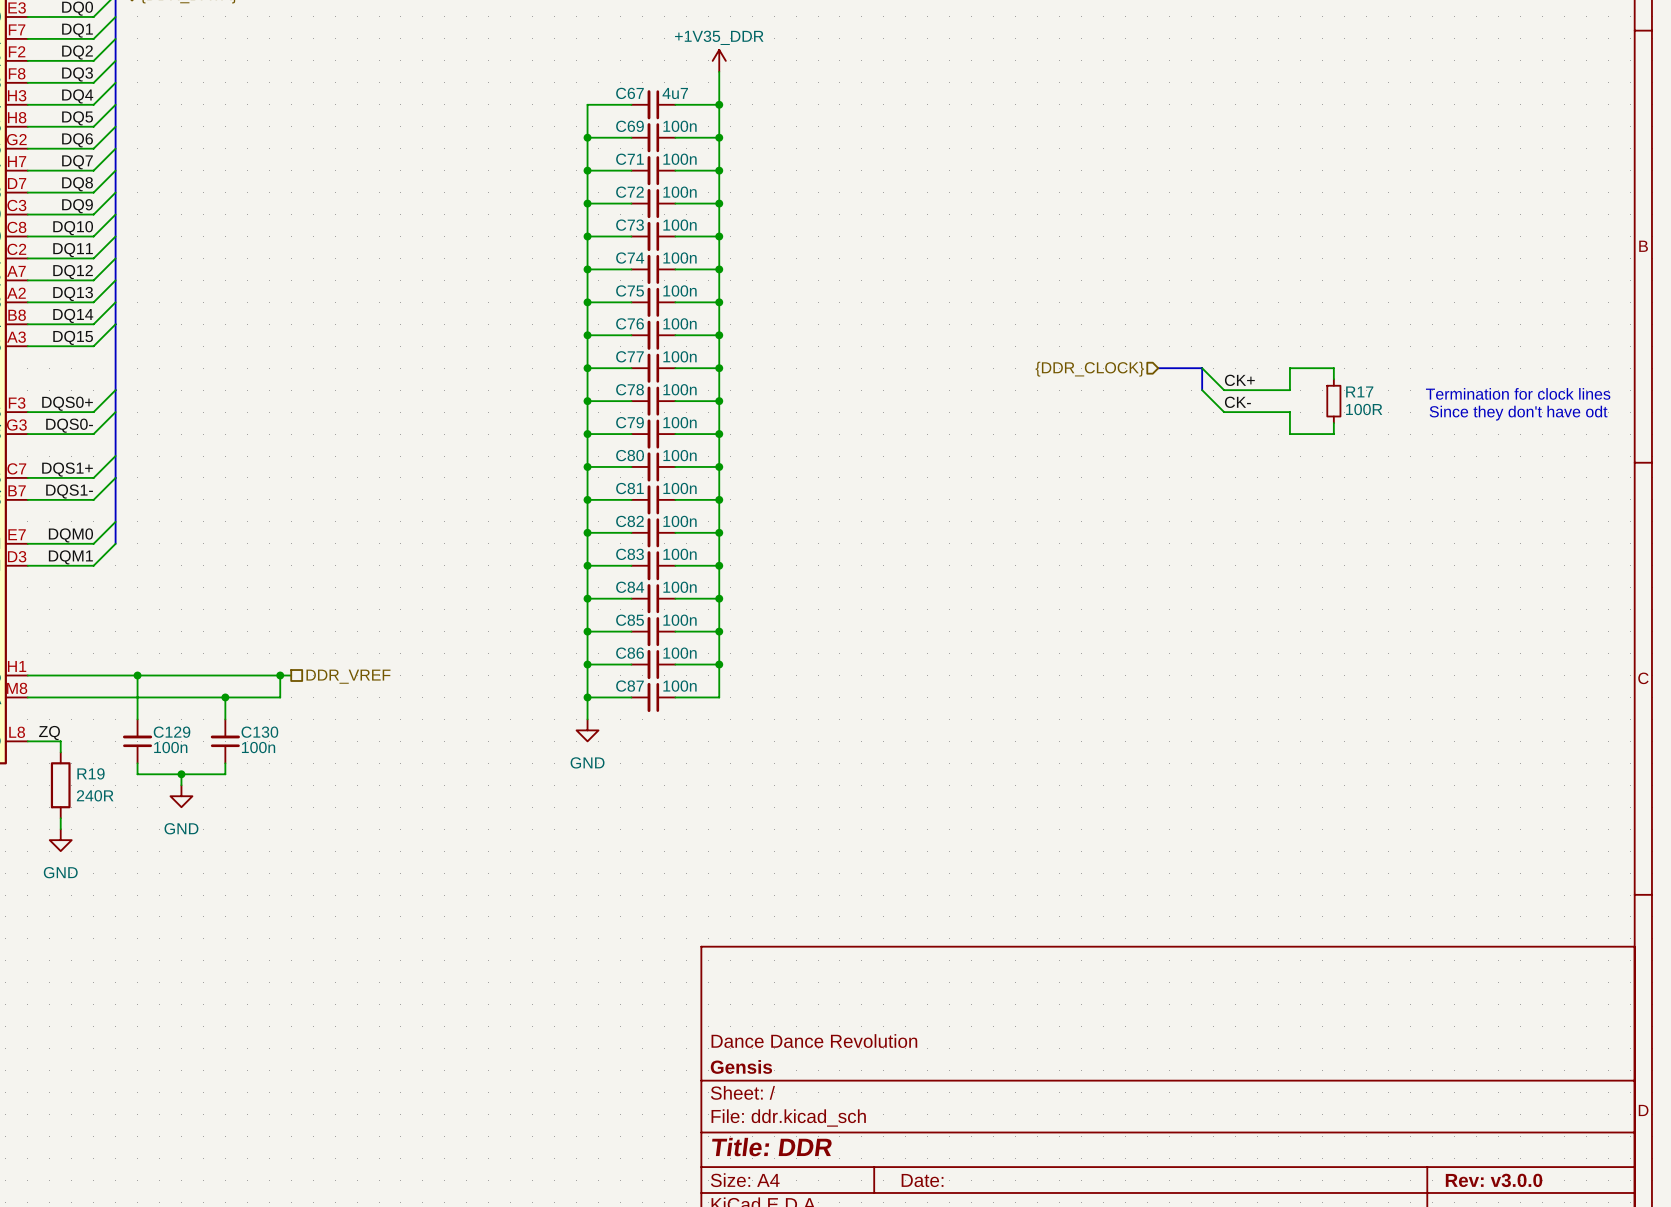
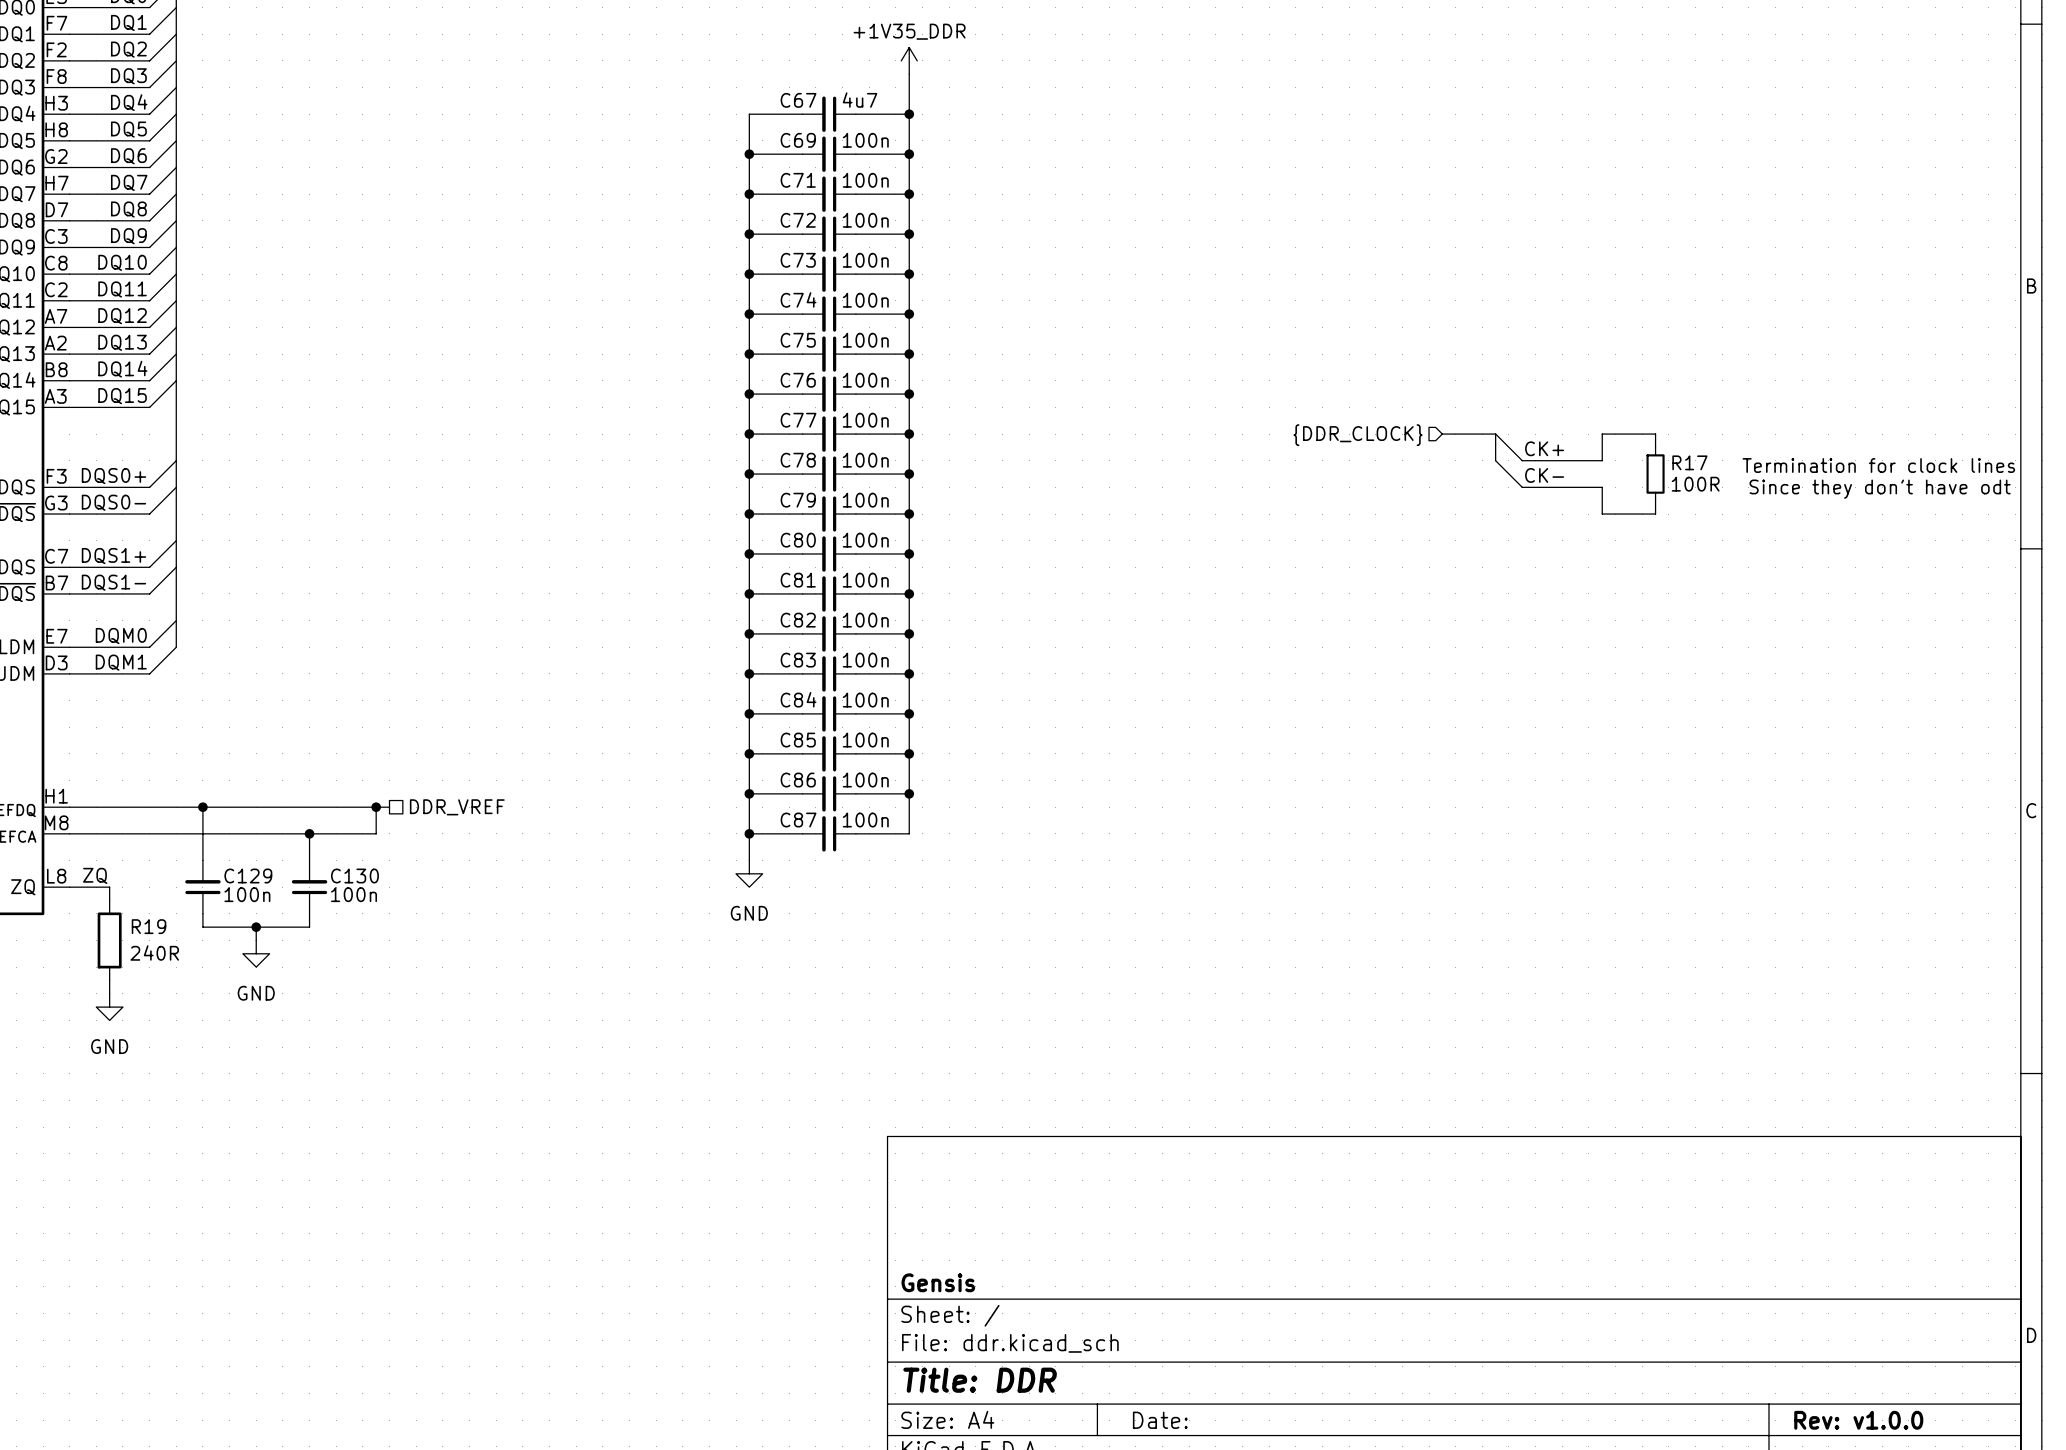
title block: Dance Dance Revolution (814, 1041) -> none
title block: Rev: v3.0.0 (1494, 1180) -> Rev: v1.0.0 (1858, 1420)

